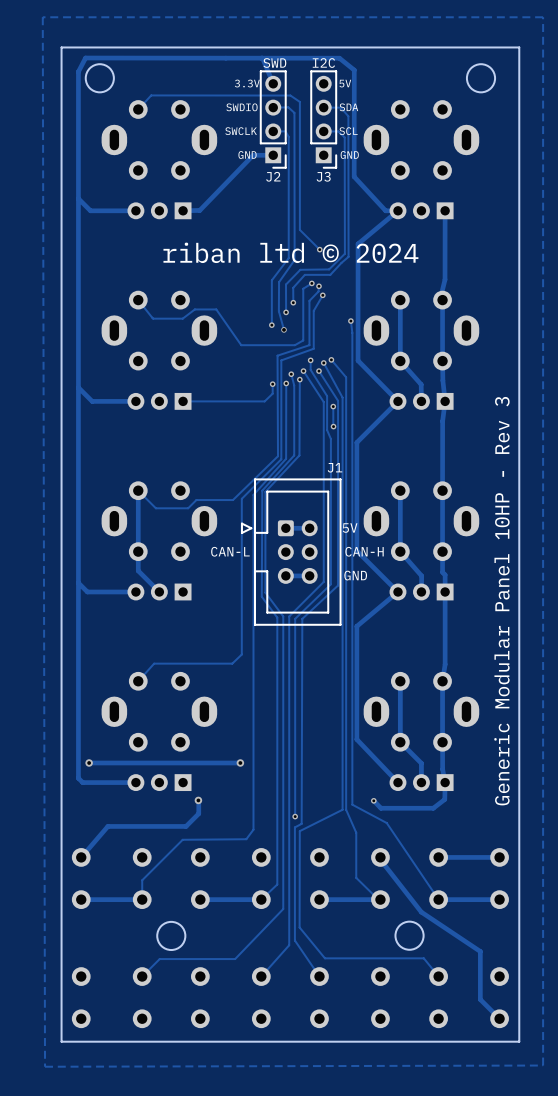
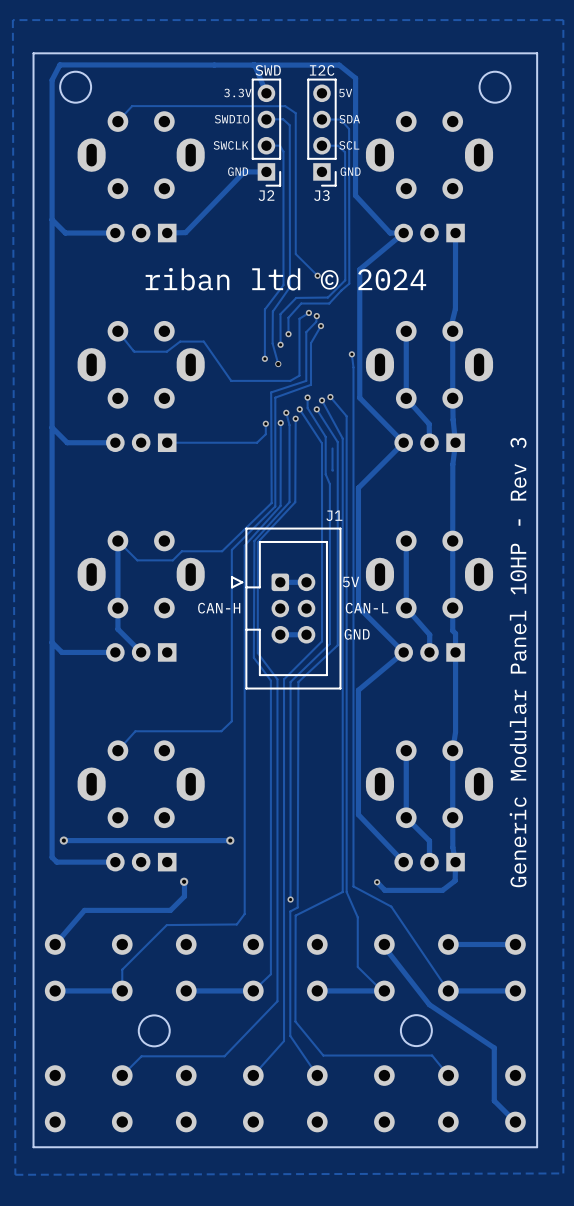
via: (333, 406) -> none
via: (333, 426) -> none
text: CAN-L (230, 551) -> CAN-H (219, 608)
text: CAN-H (364, 551) -> CAN-L (367, 608)

